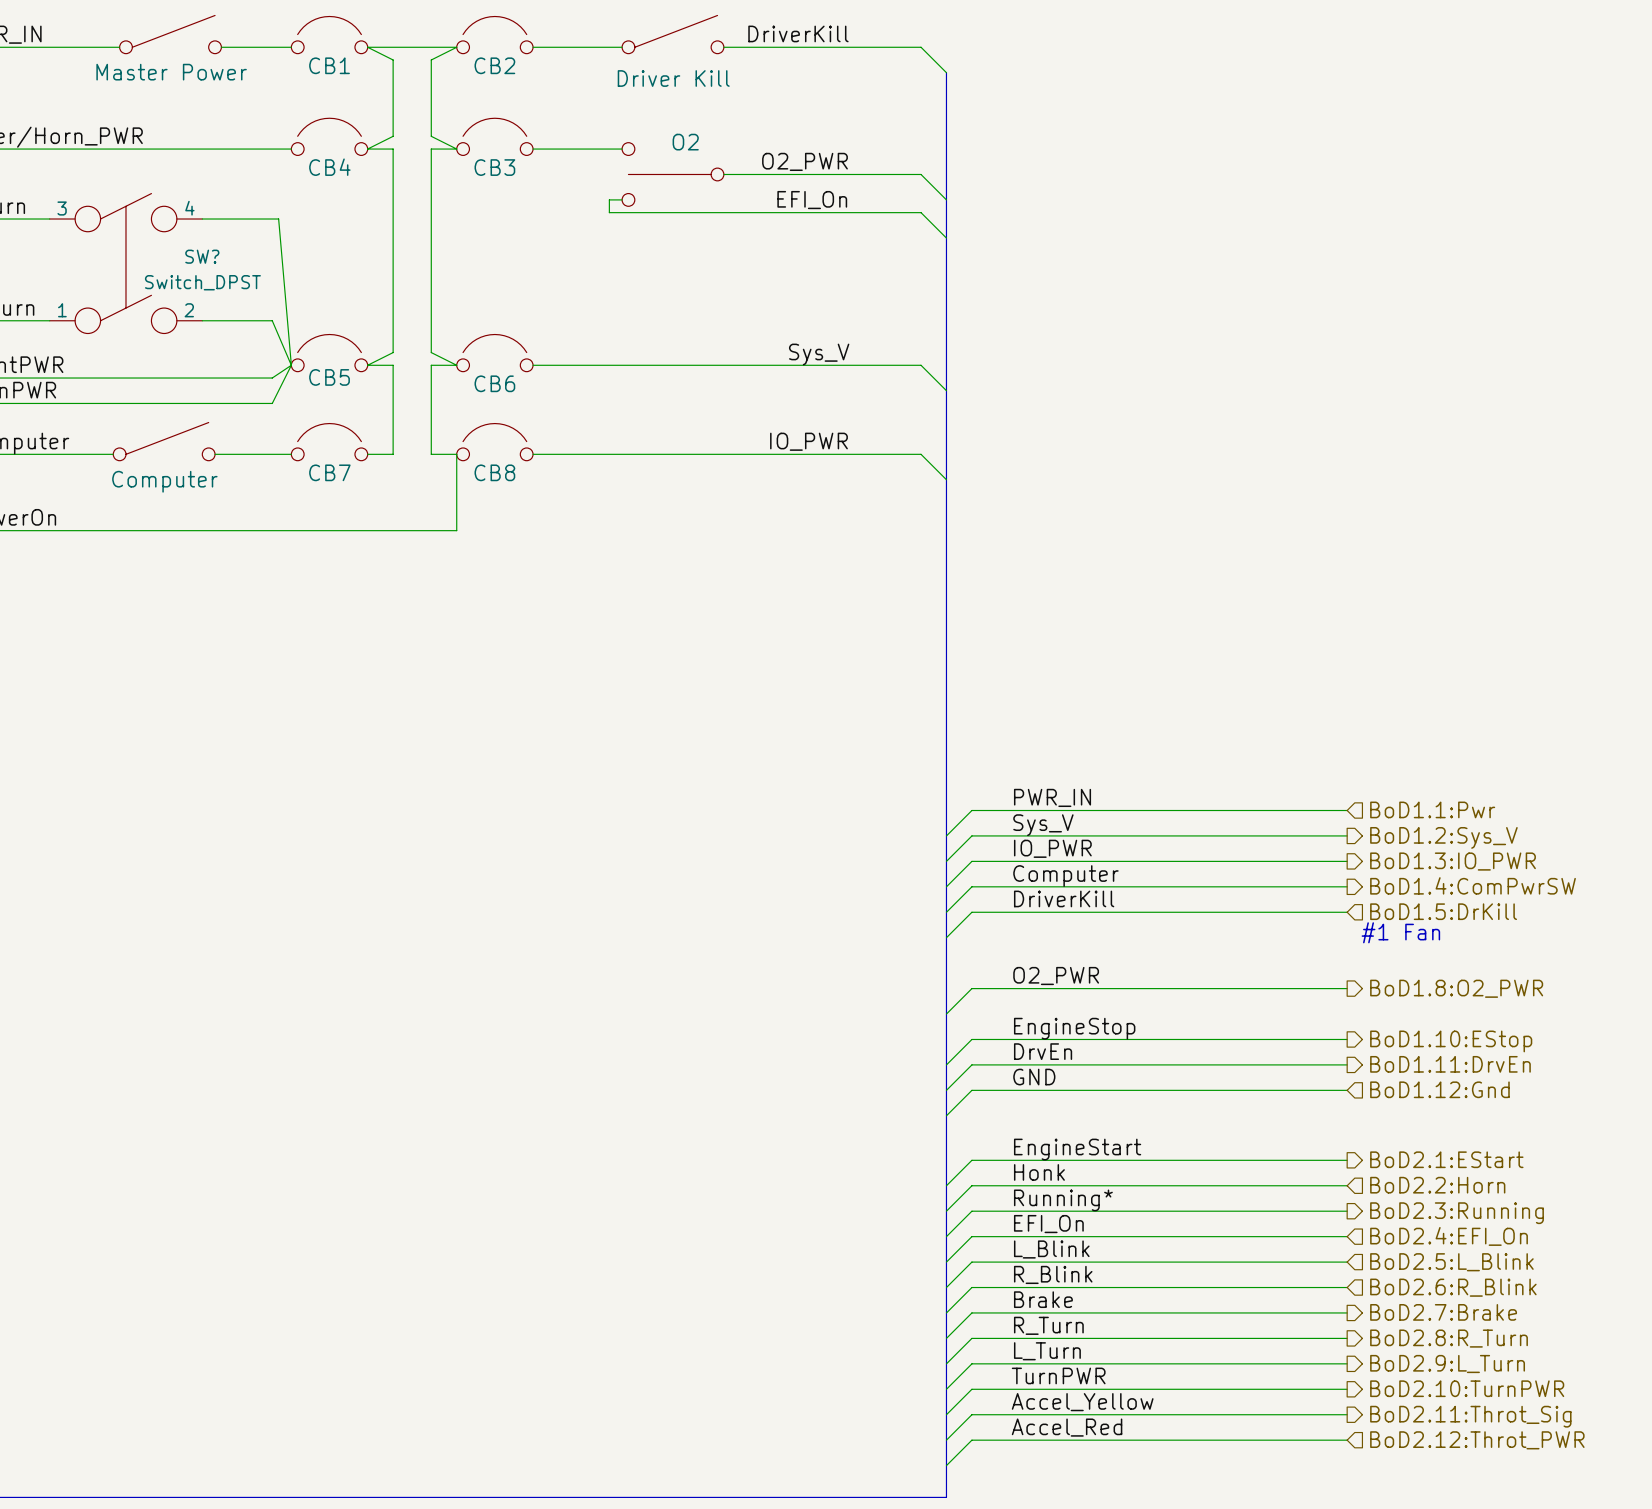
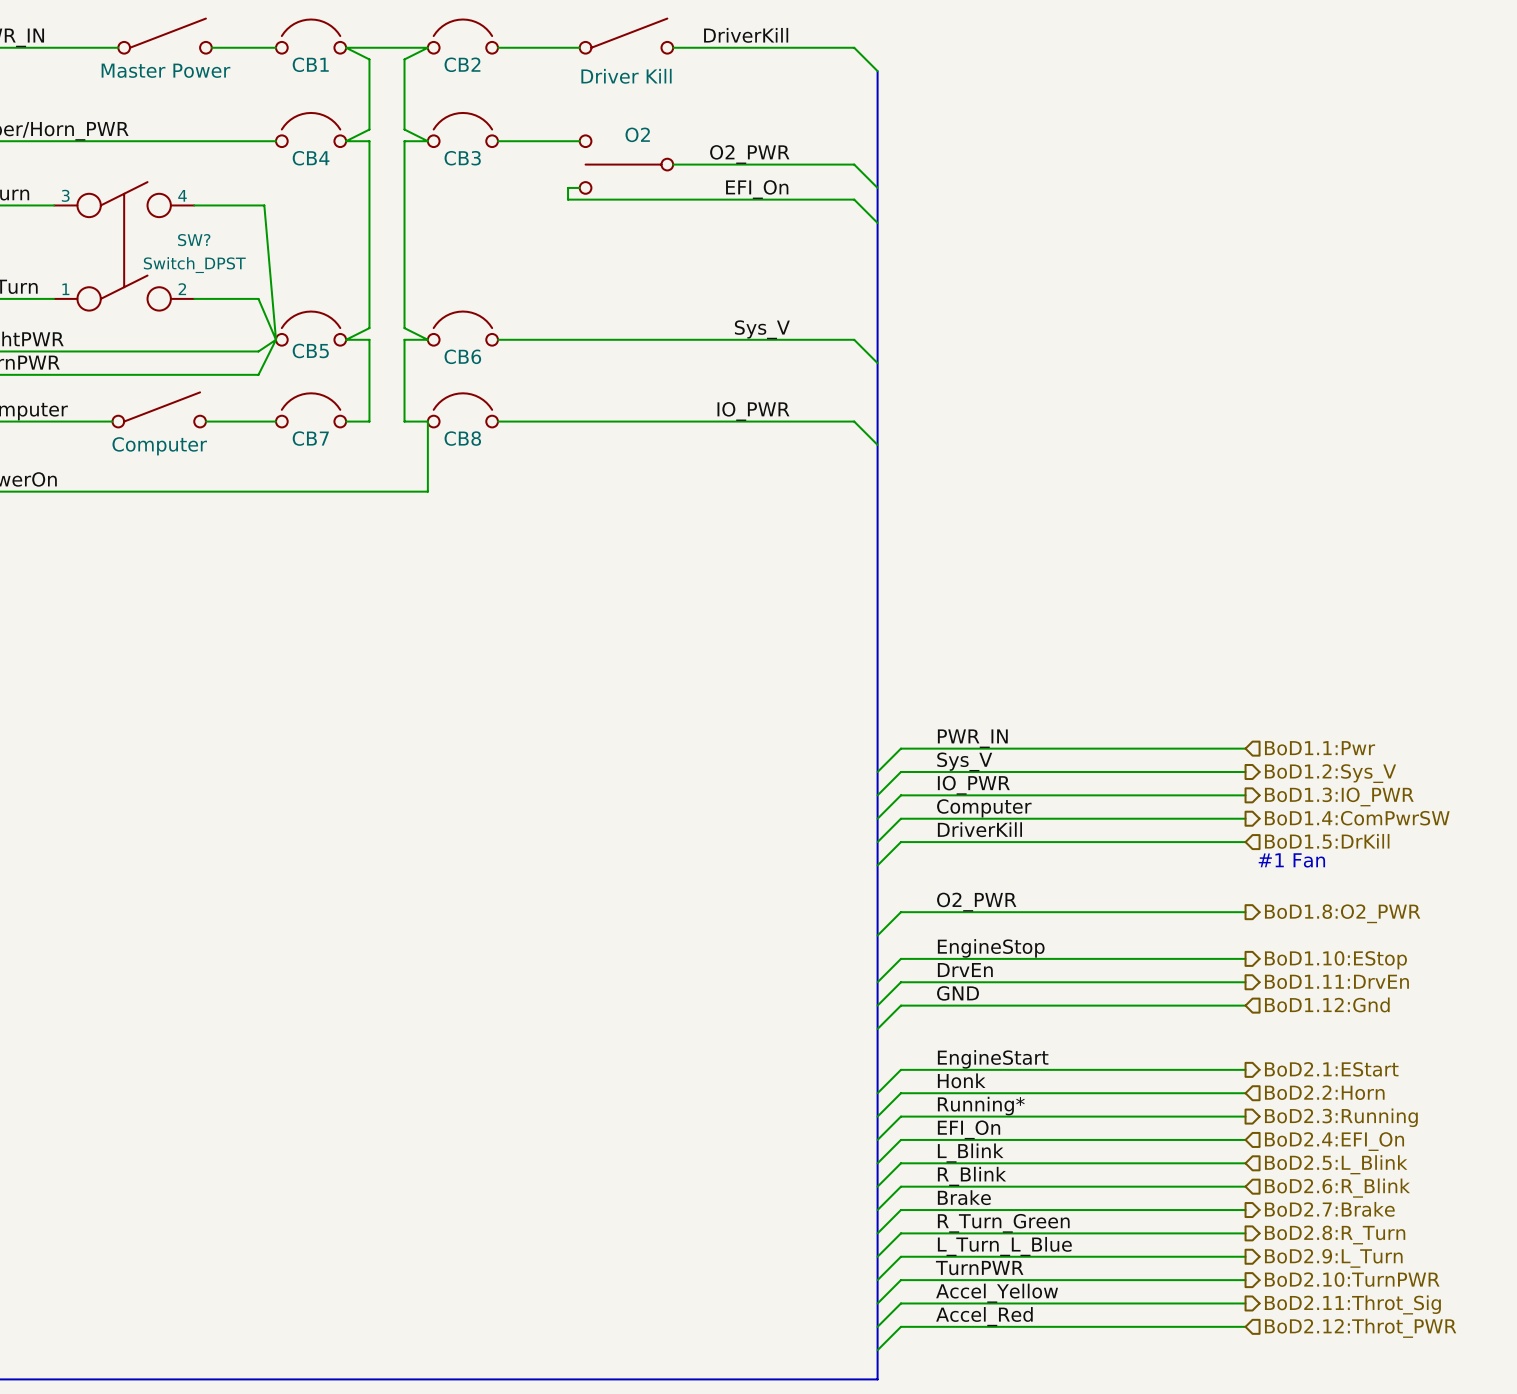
label: R_Turn (1048, 1325) -> R_Turn_Green (1003, 1223)
label: L_Turn (1047, 1351) -> L_Turn_L_Blue (1004, 1246)

